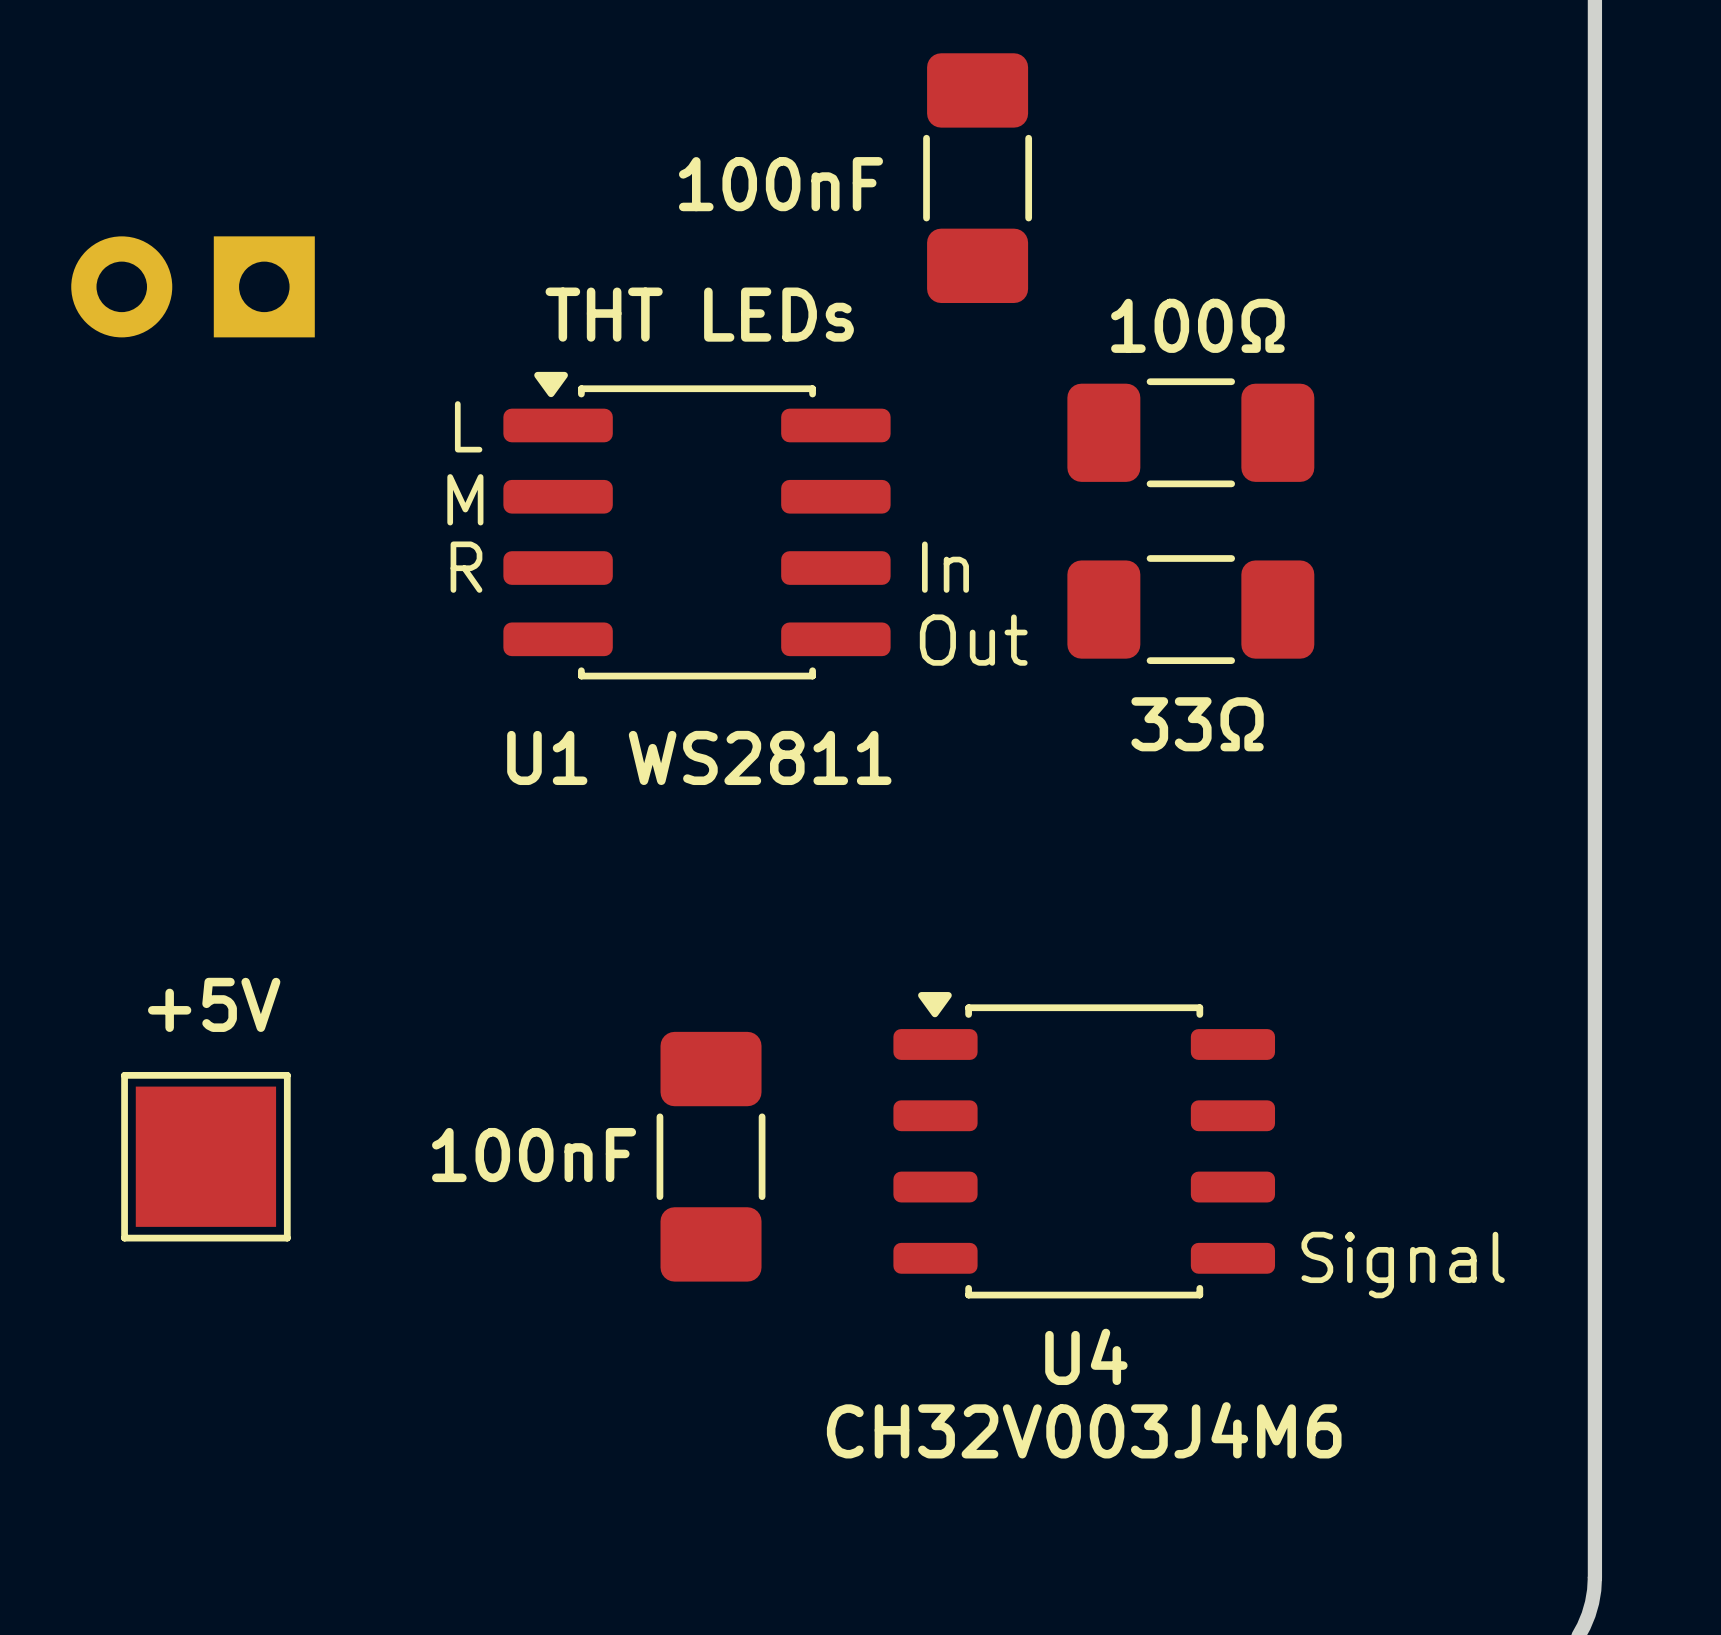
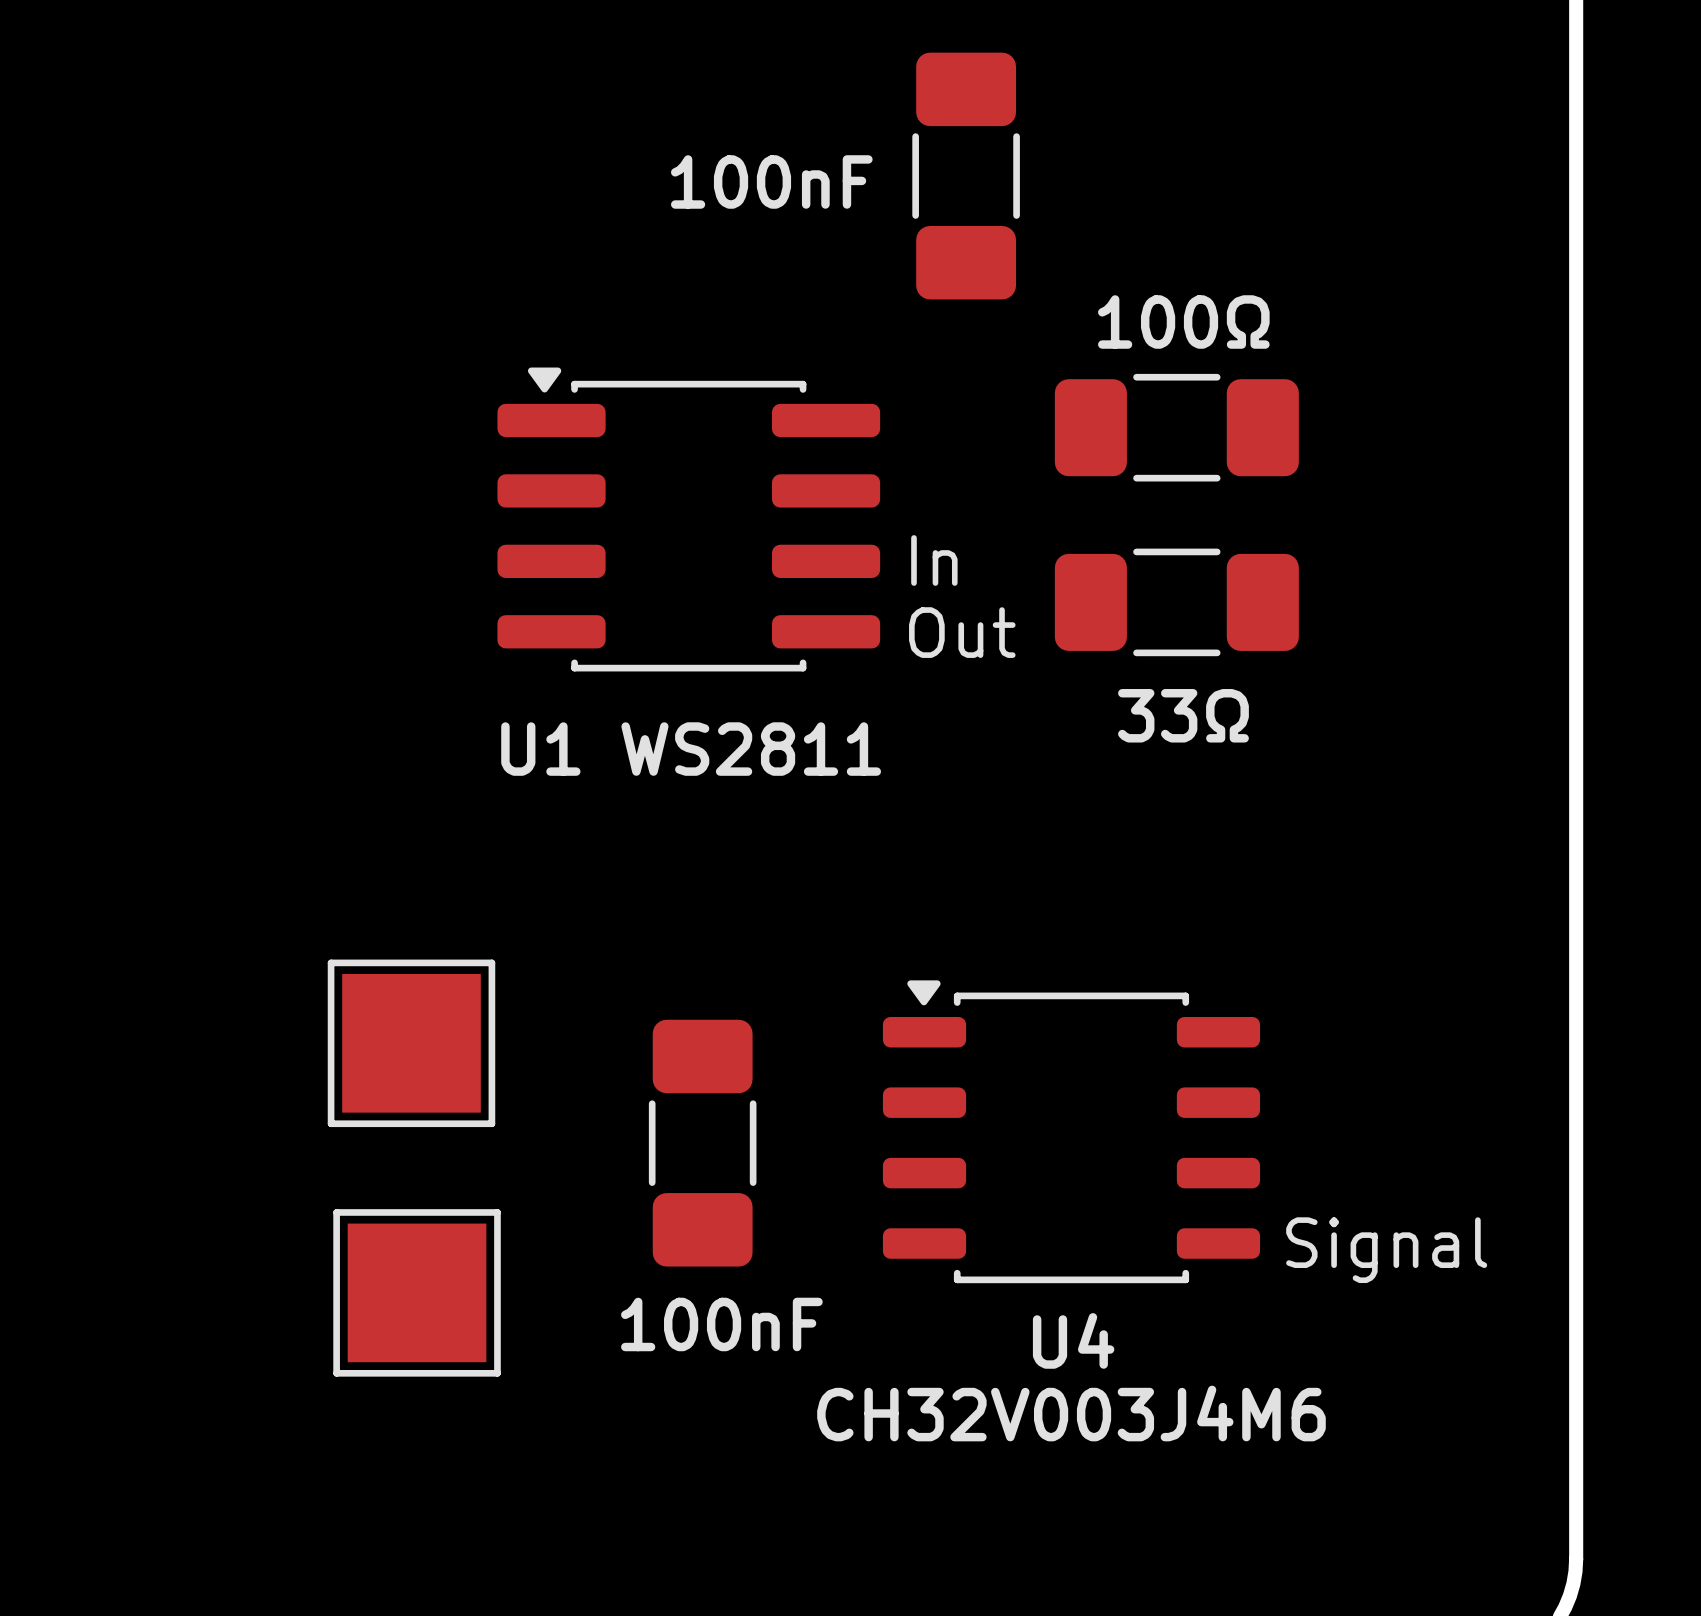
part: (193, 286) -> none
text: THT LEDs (699, 314) -> none
text: L (468, 426) -> none
text: M (465, 499) -> none
text: R (466, 567) -> none
text: +5V (214, 1004) -> none
part: none -> (411, 1043)
text position: 100nF (534, 1155) -> 100nF (721, 1324)
part: (205, 1156) -> none
part: none -> (417, 1292)

